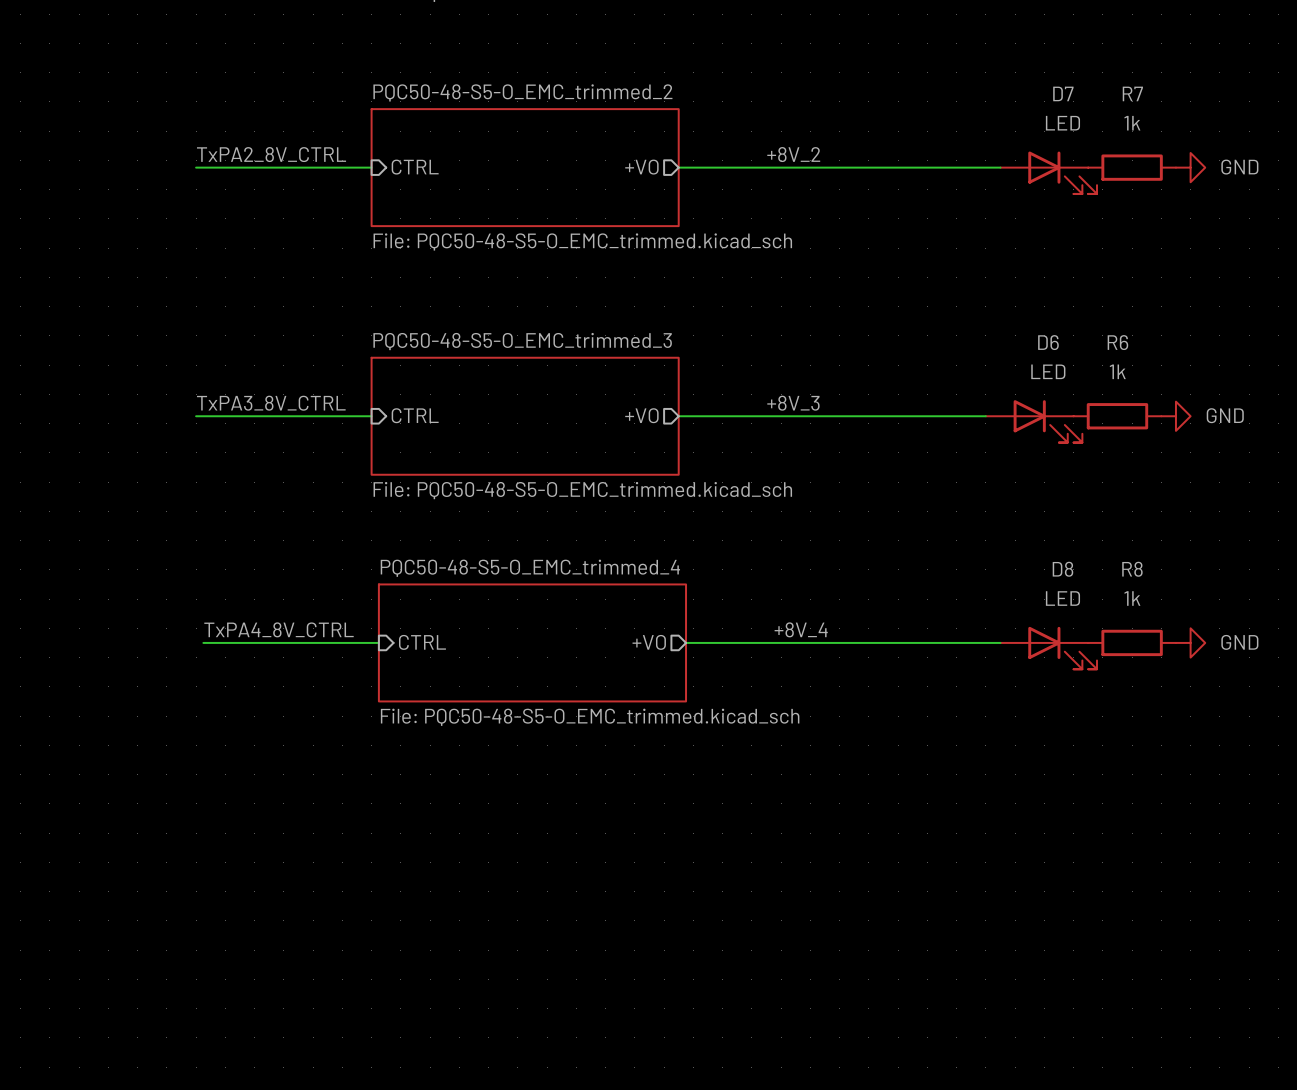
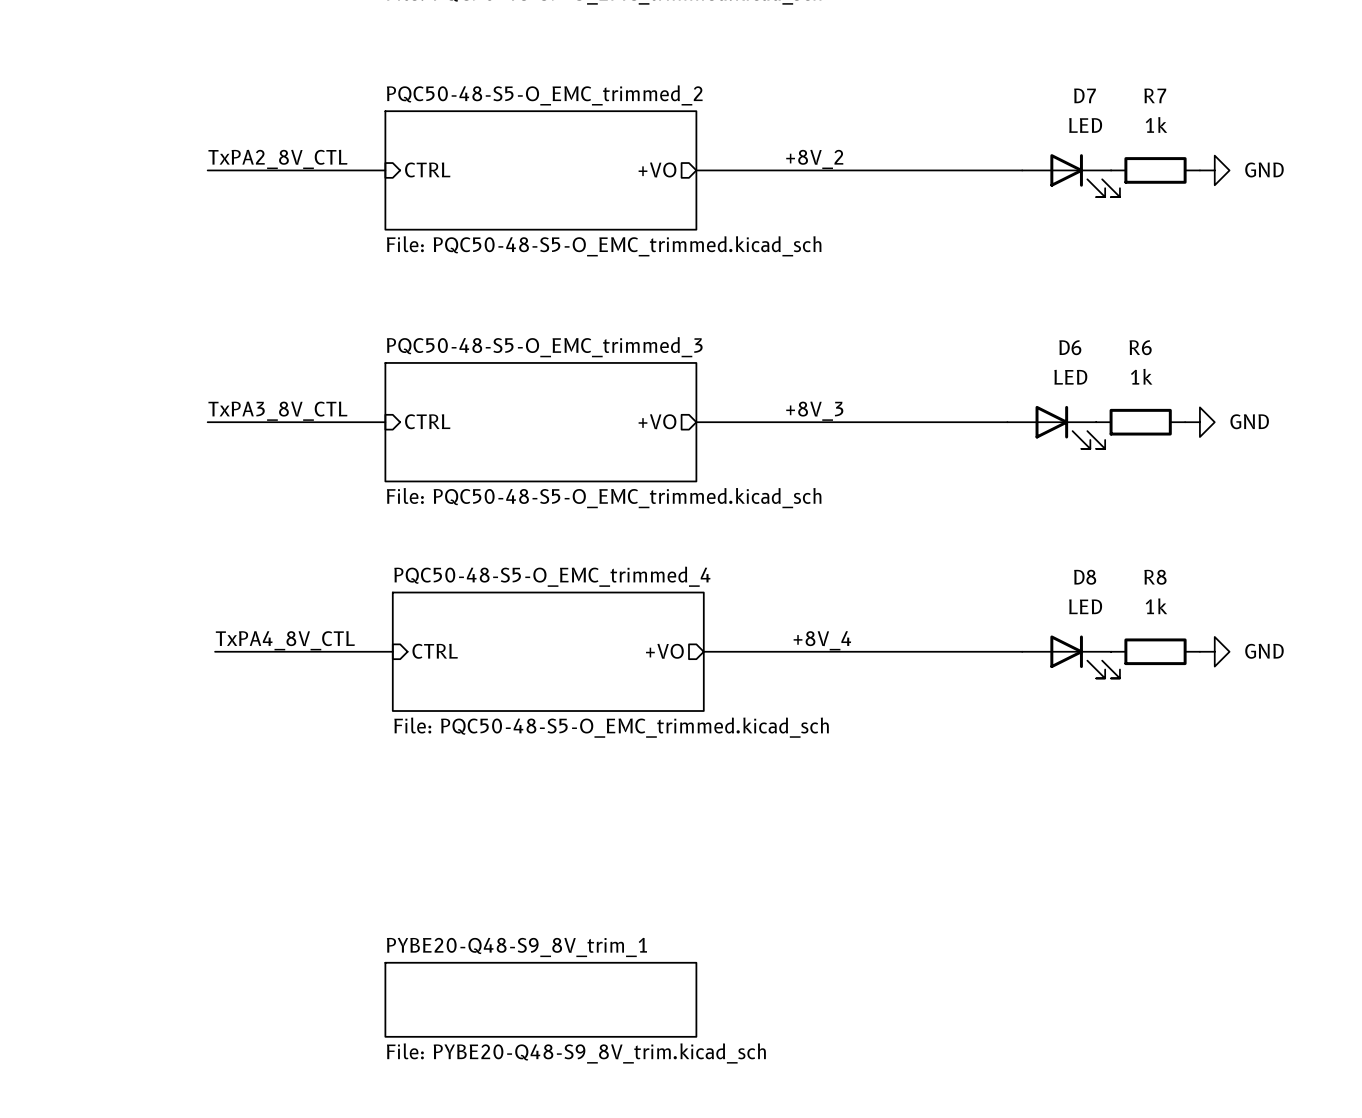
label: TxPA2_8V_CTRL (271, 154) -> TxPA2_8V_CTL (277, 159)
label: TxPA3_8V_CTRL (271, 403) -> TxPA3_8V_CTL (277, 411)
label: TxPA4_8V_CTRL (279, 629) -> TxPA4_8V_CTL (285, 640)
sheet PYBE20-Q48-S9_8V_trim_1: none -> File: PYBE20-Q48-S9_8V_trim.kicad_sch (540, 999)

